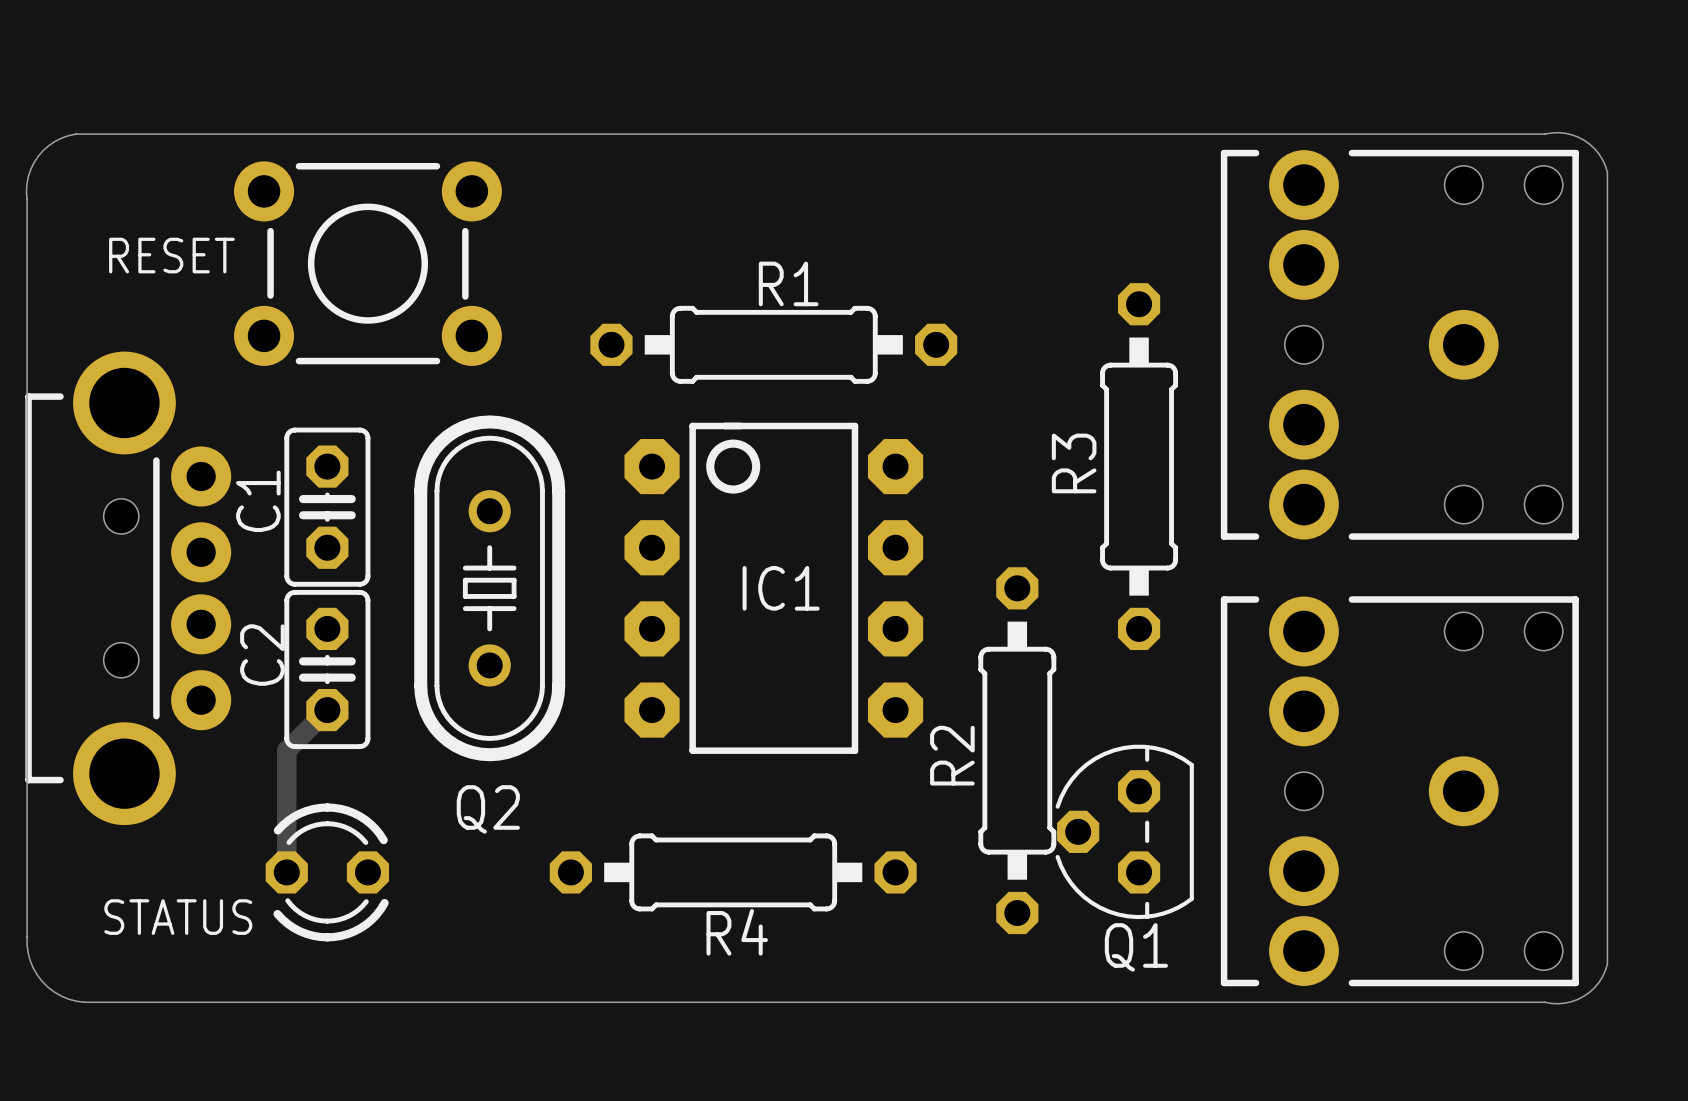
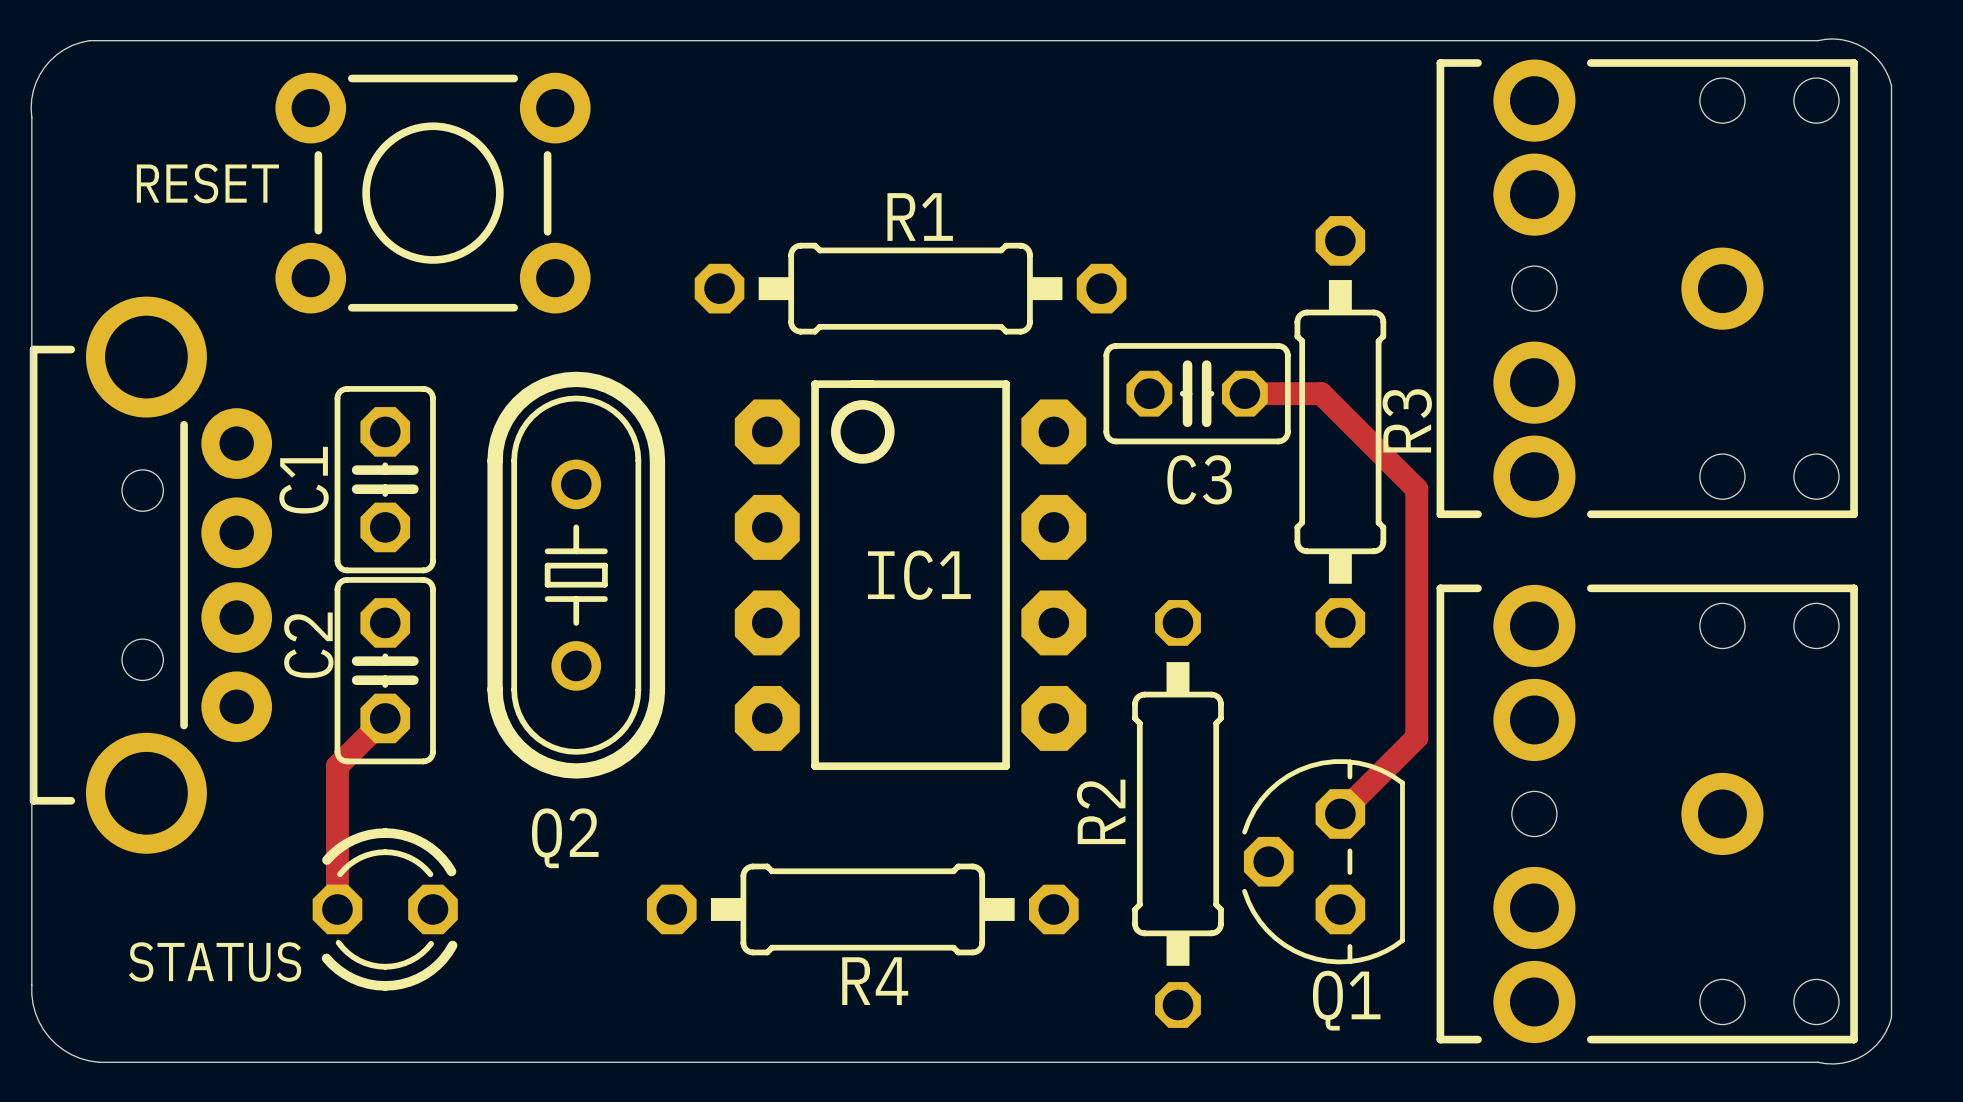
C3: none -> (1197, 393)
track: none -> (1244, 393) (1321, 393) (1416, 489) (1416, 737) (1340, 813)
R3 name position: R3 (1074, 463) -> R3 (1407, 420)
R2 footprint: [978, 567, 1057, 935] -> [1132, 600, 1224, 1028]

